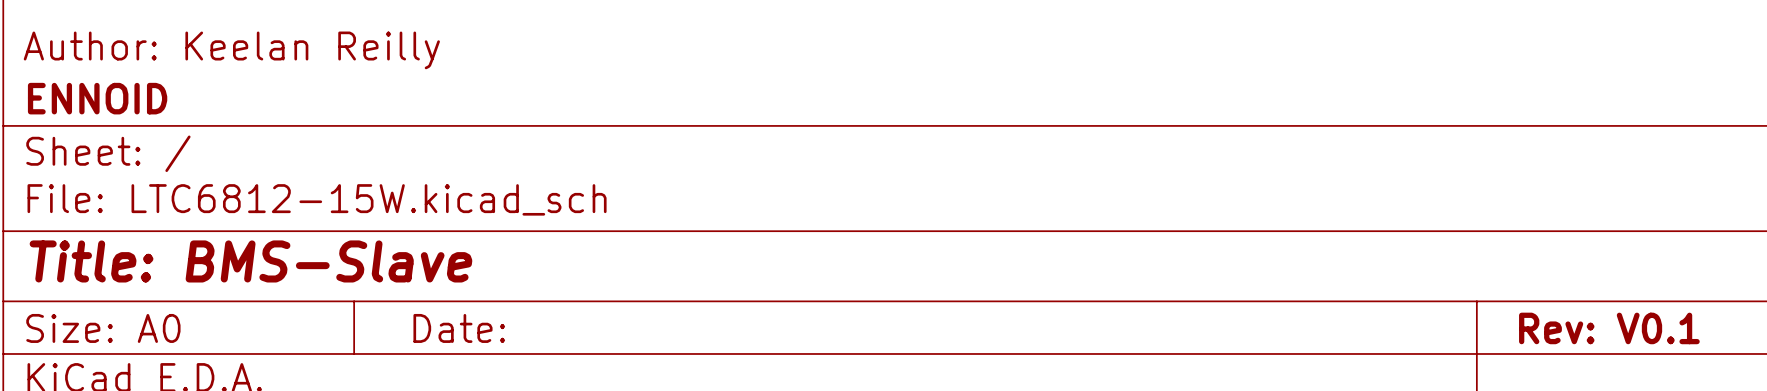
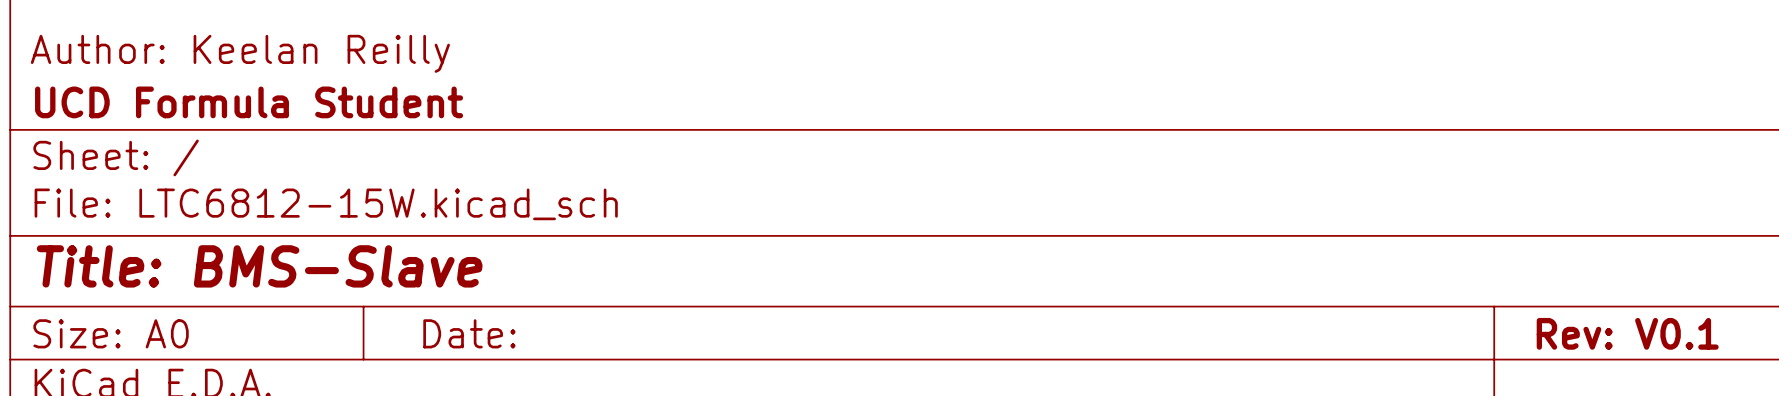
title block: ENNOID (97, 98) -> UCD Formula Student (249, 102)

